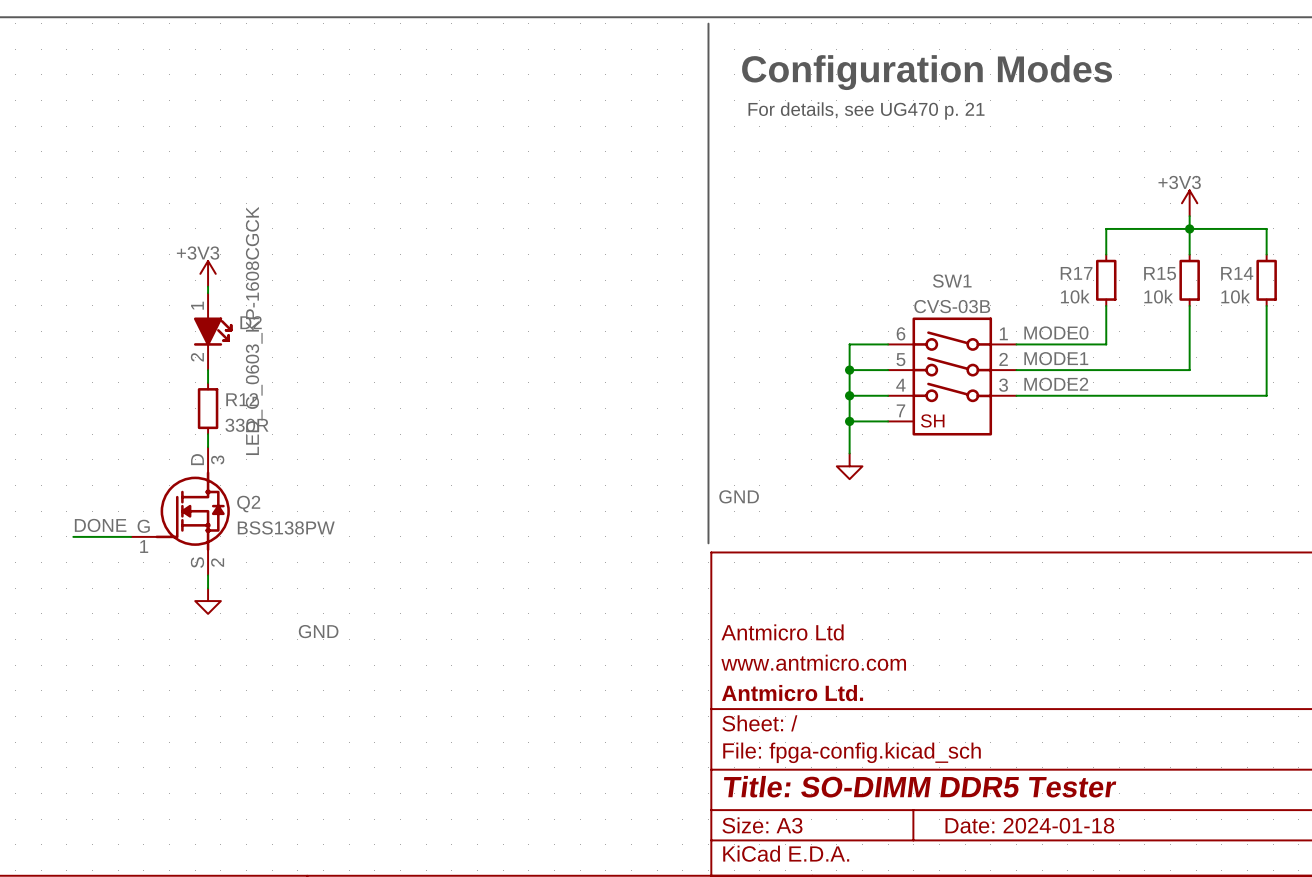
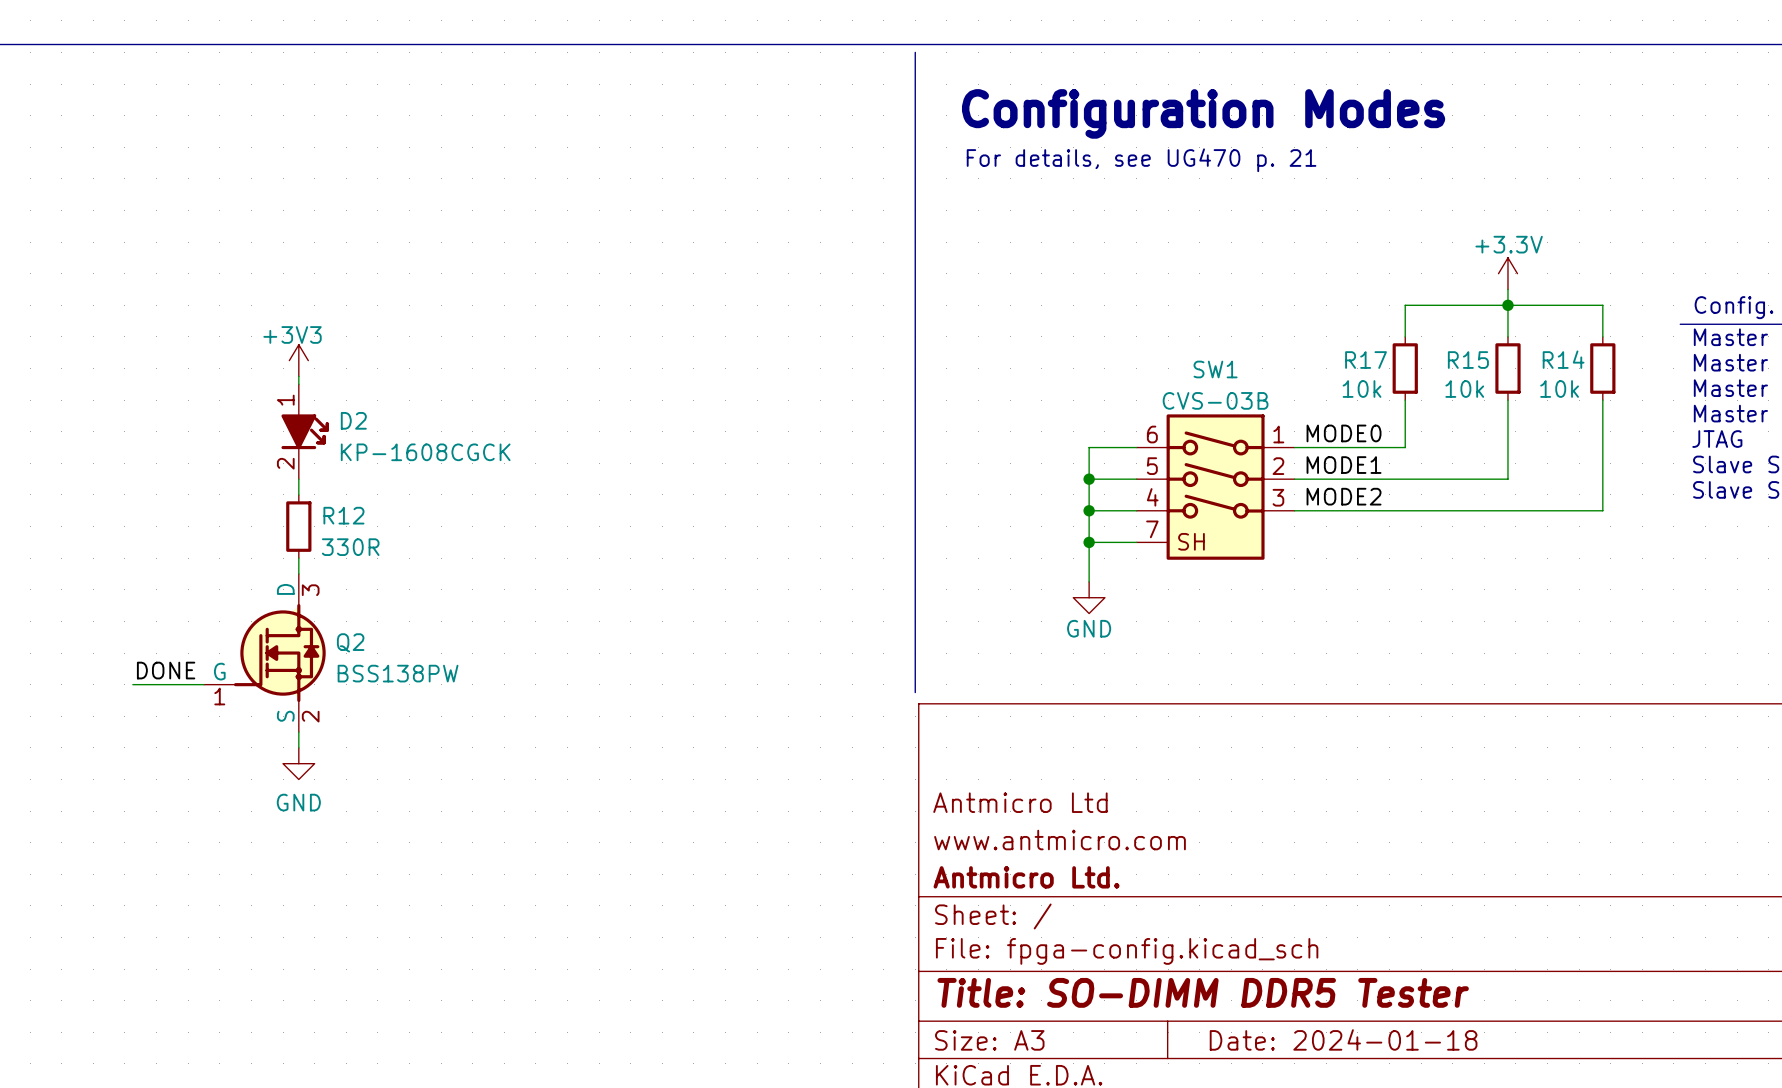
power symbol: +3V3 (1189, 203) -> +3.3V (1507, 273)
D2 value: LED_G_0603_KP-1608CGCK (254, 330) -> none
D2 text: none -> KP-1608CGCK (425, 452)
power symbol text position: GND (739, 496) -> GND (1089, 628)
power symbol text position: GND (318, 631) -> GND (298, 802)

